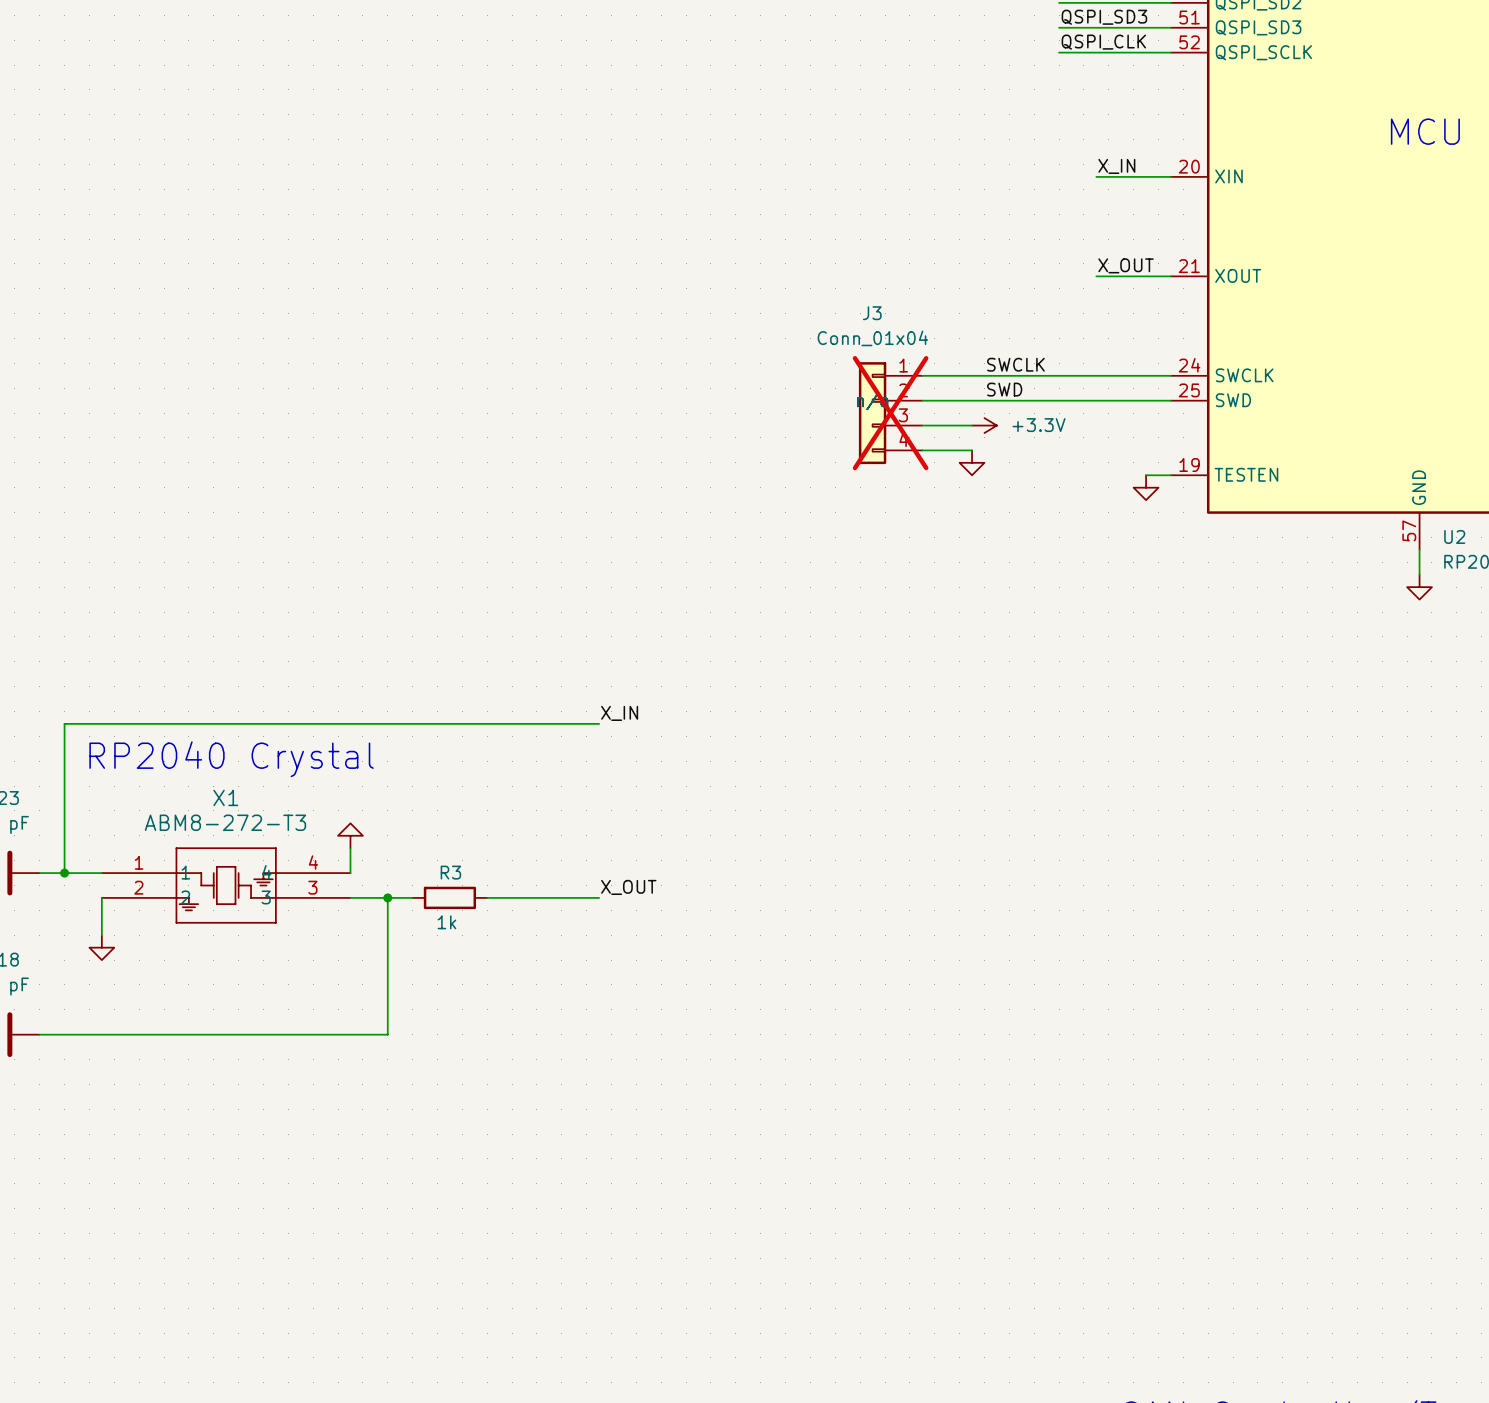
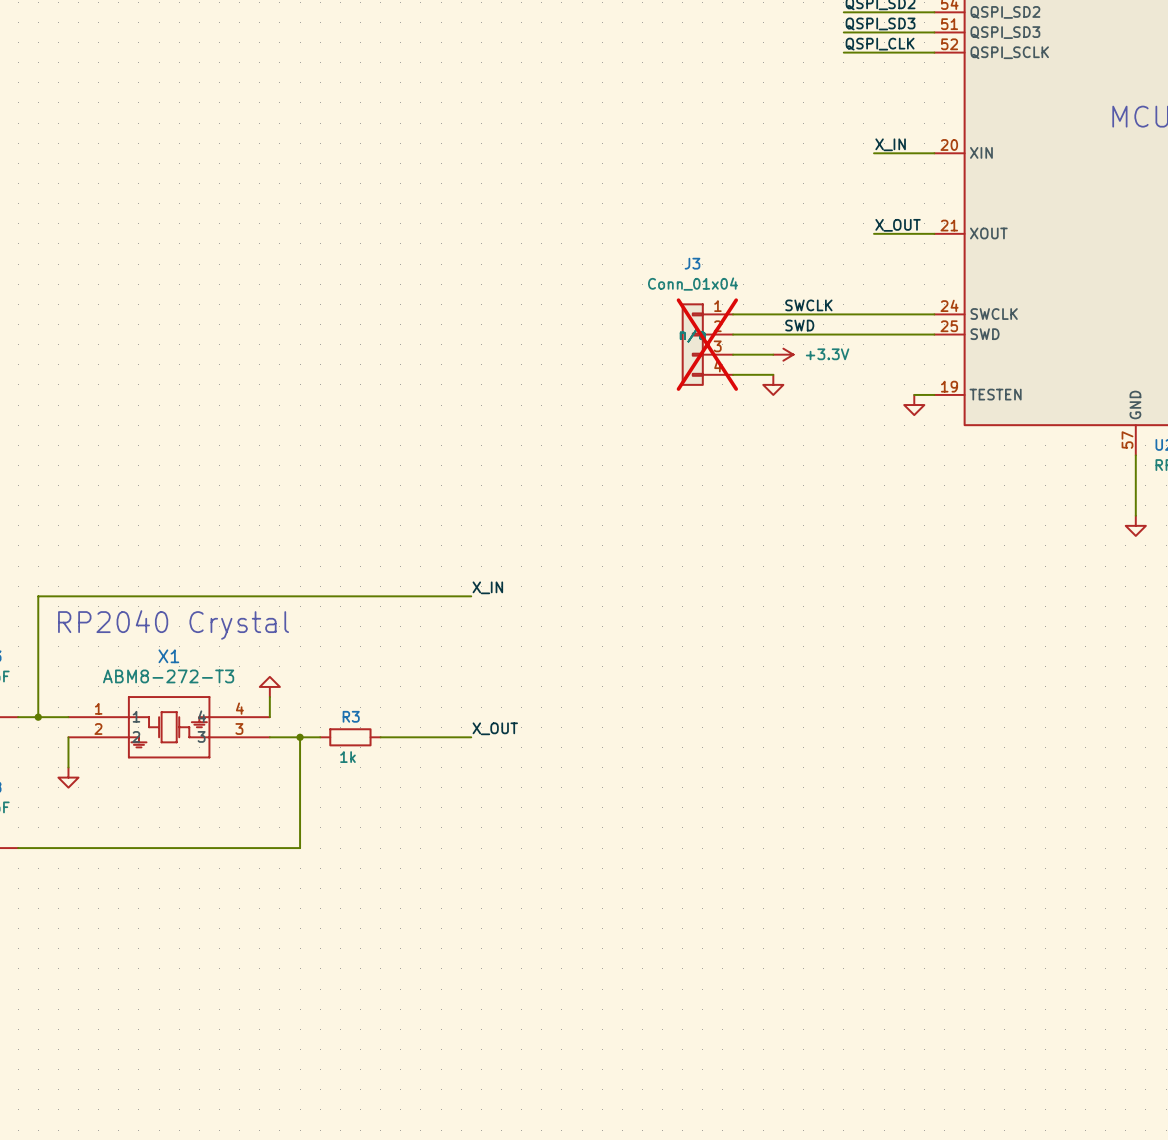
wire: none -> (1135, 475) (1135, 515)
power symbol position: (1419, 587) -> (1135, 525)

